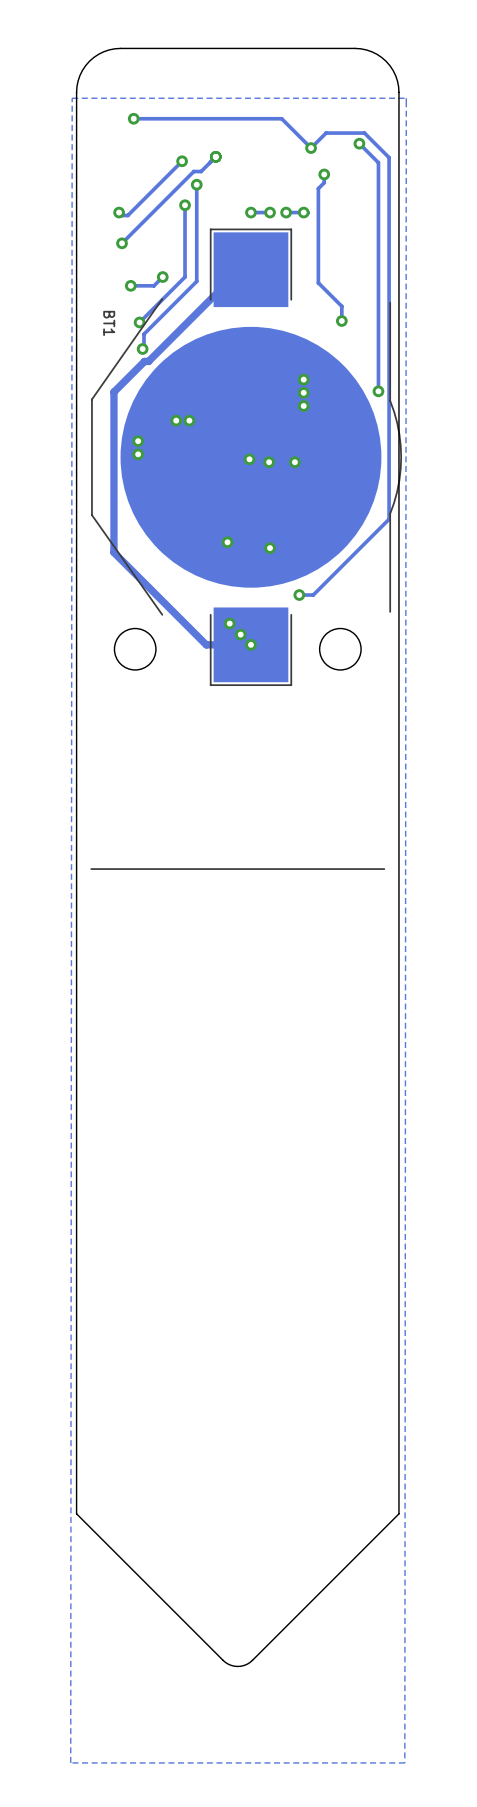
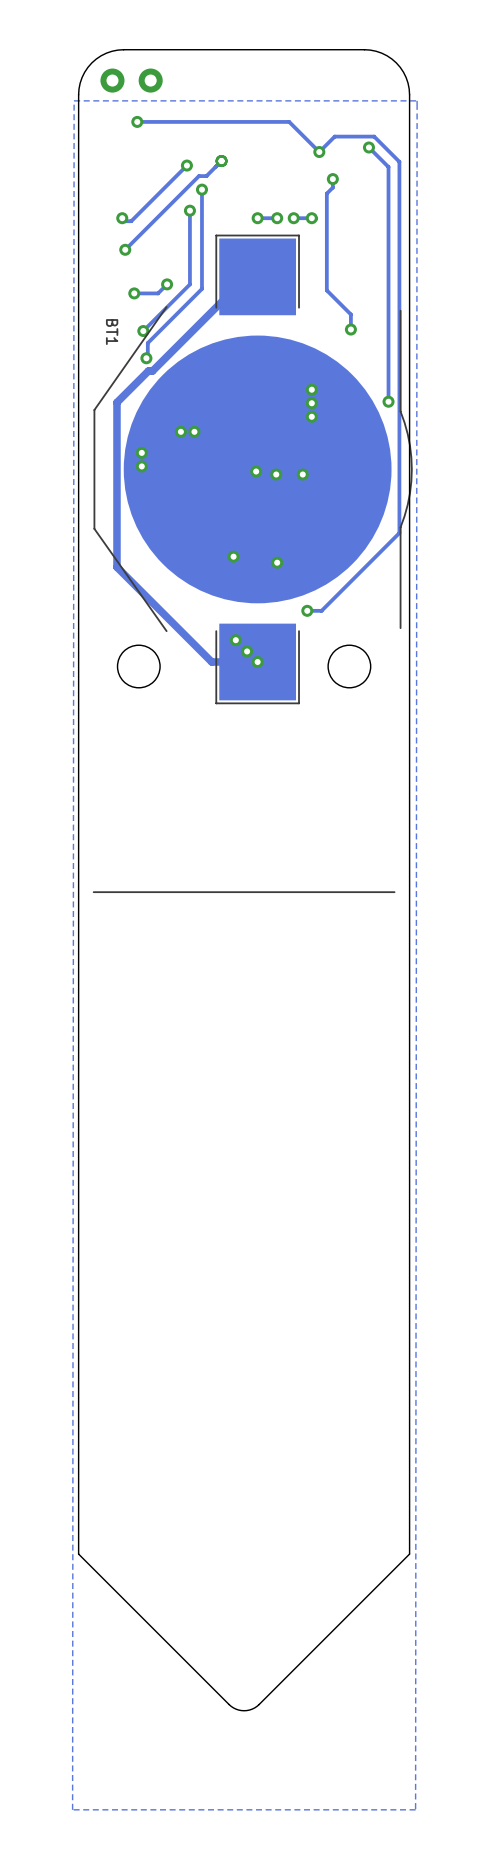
part: none -> (131, 80)

